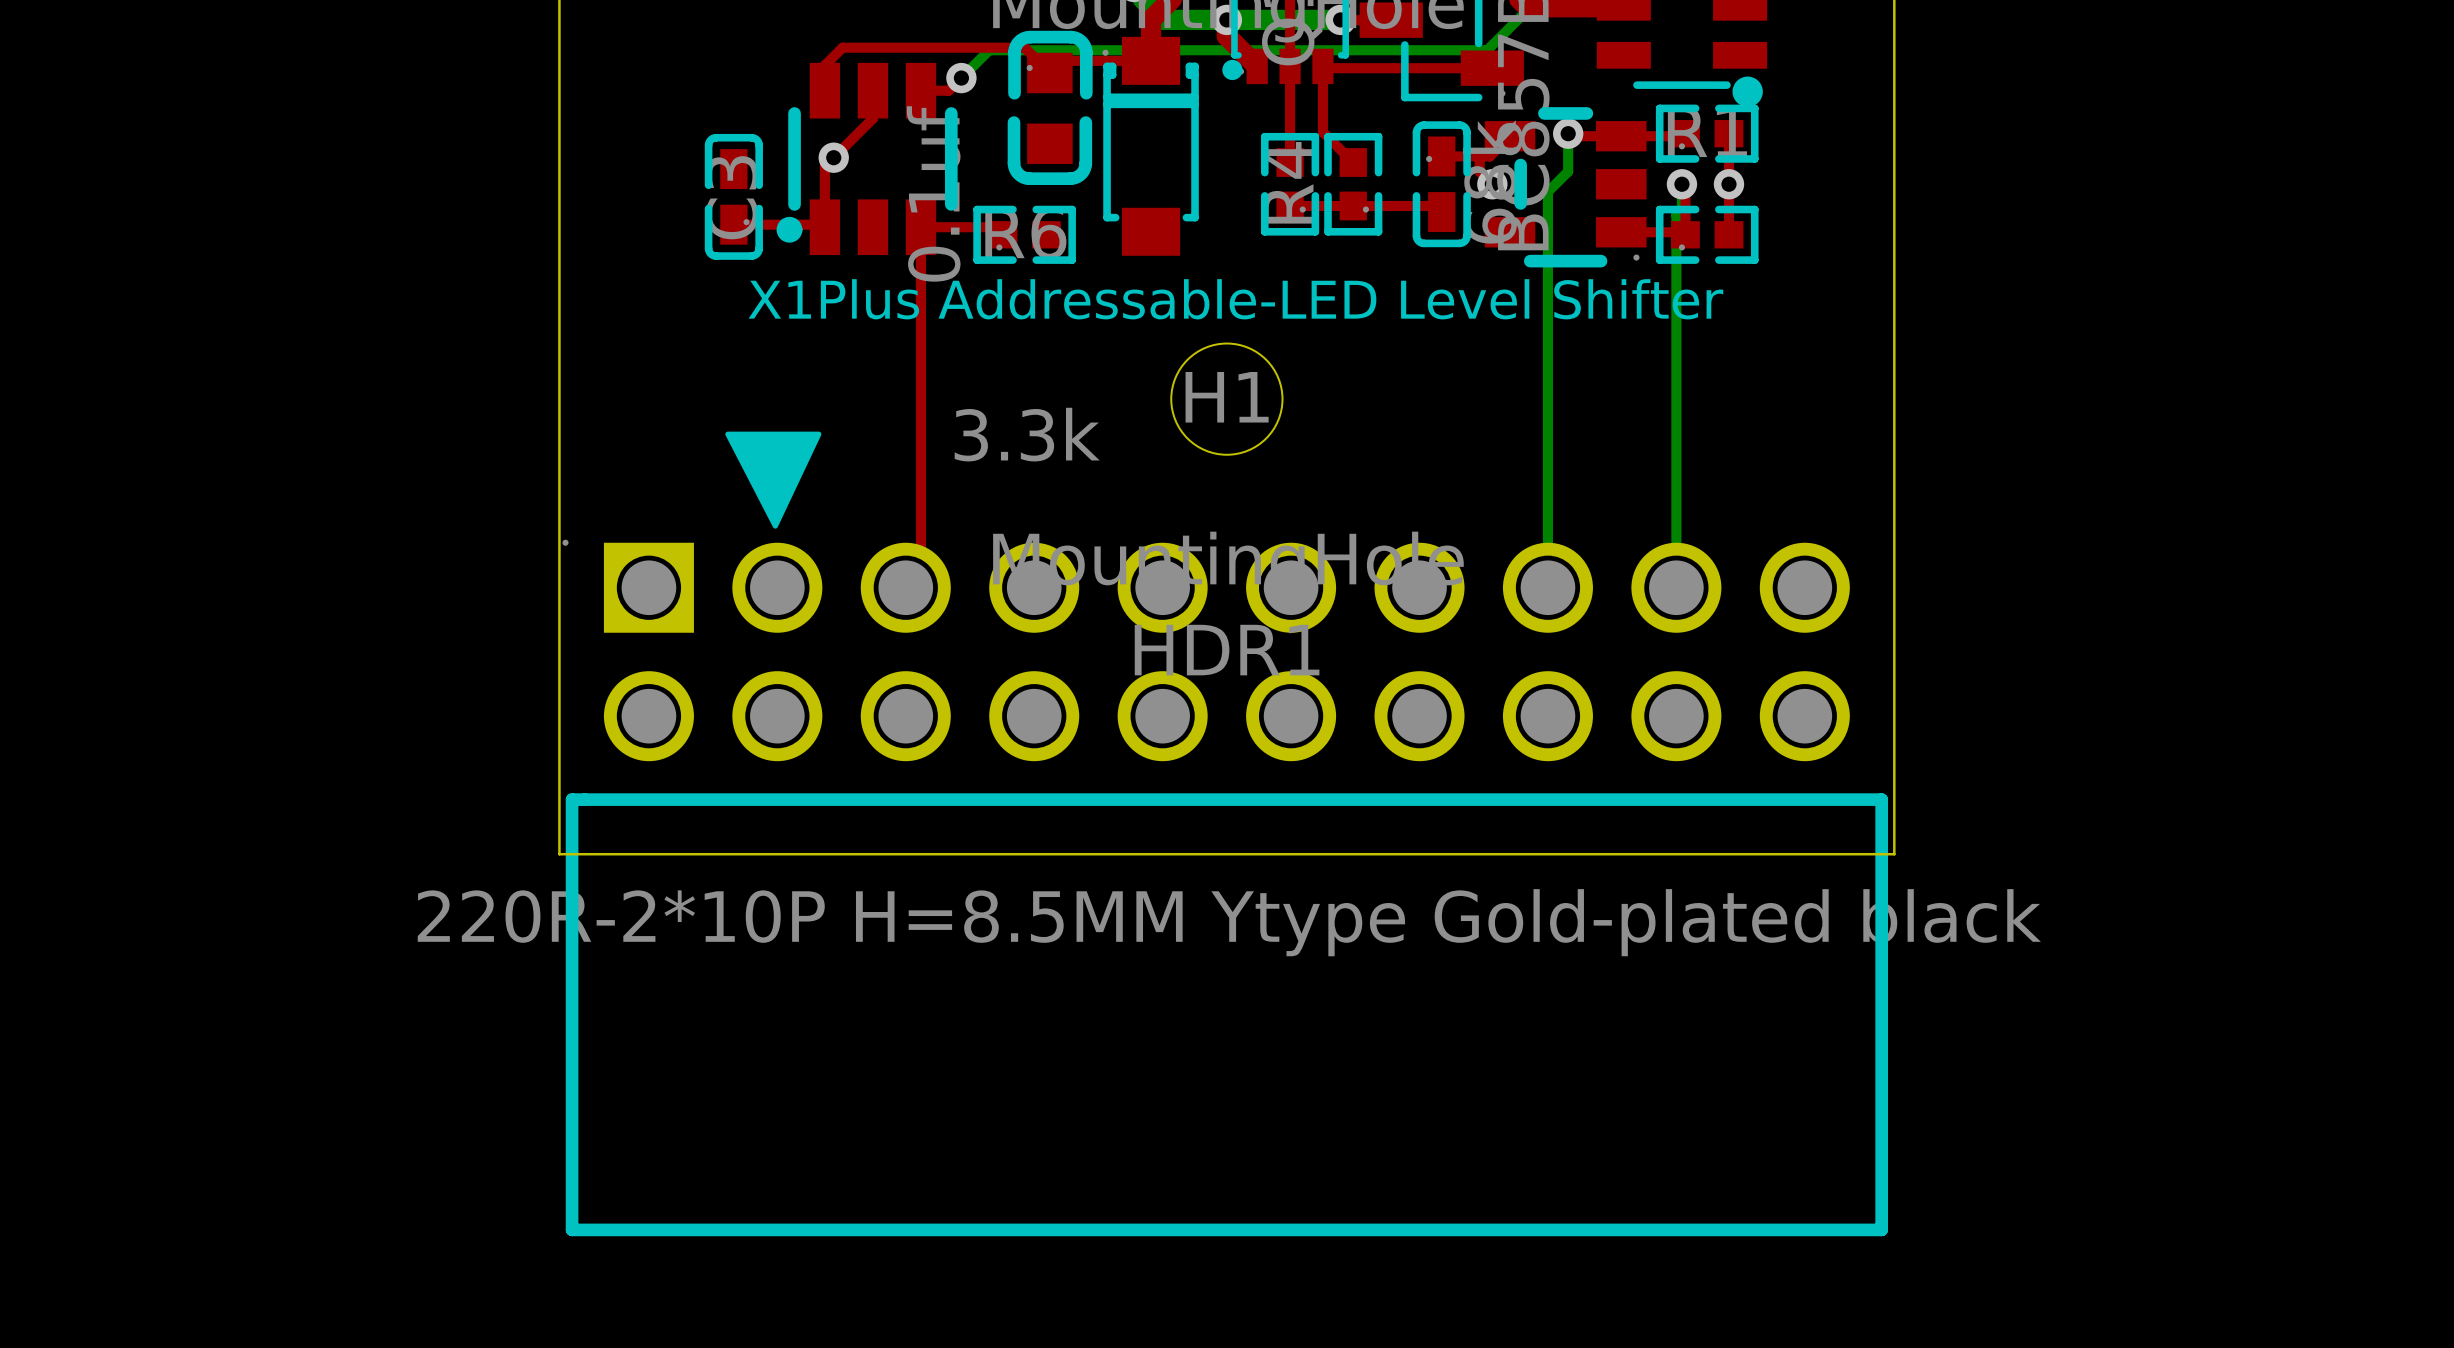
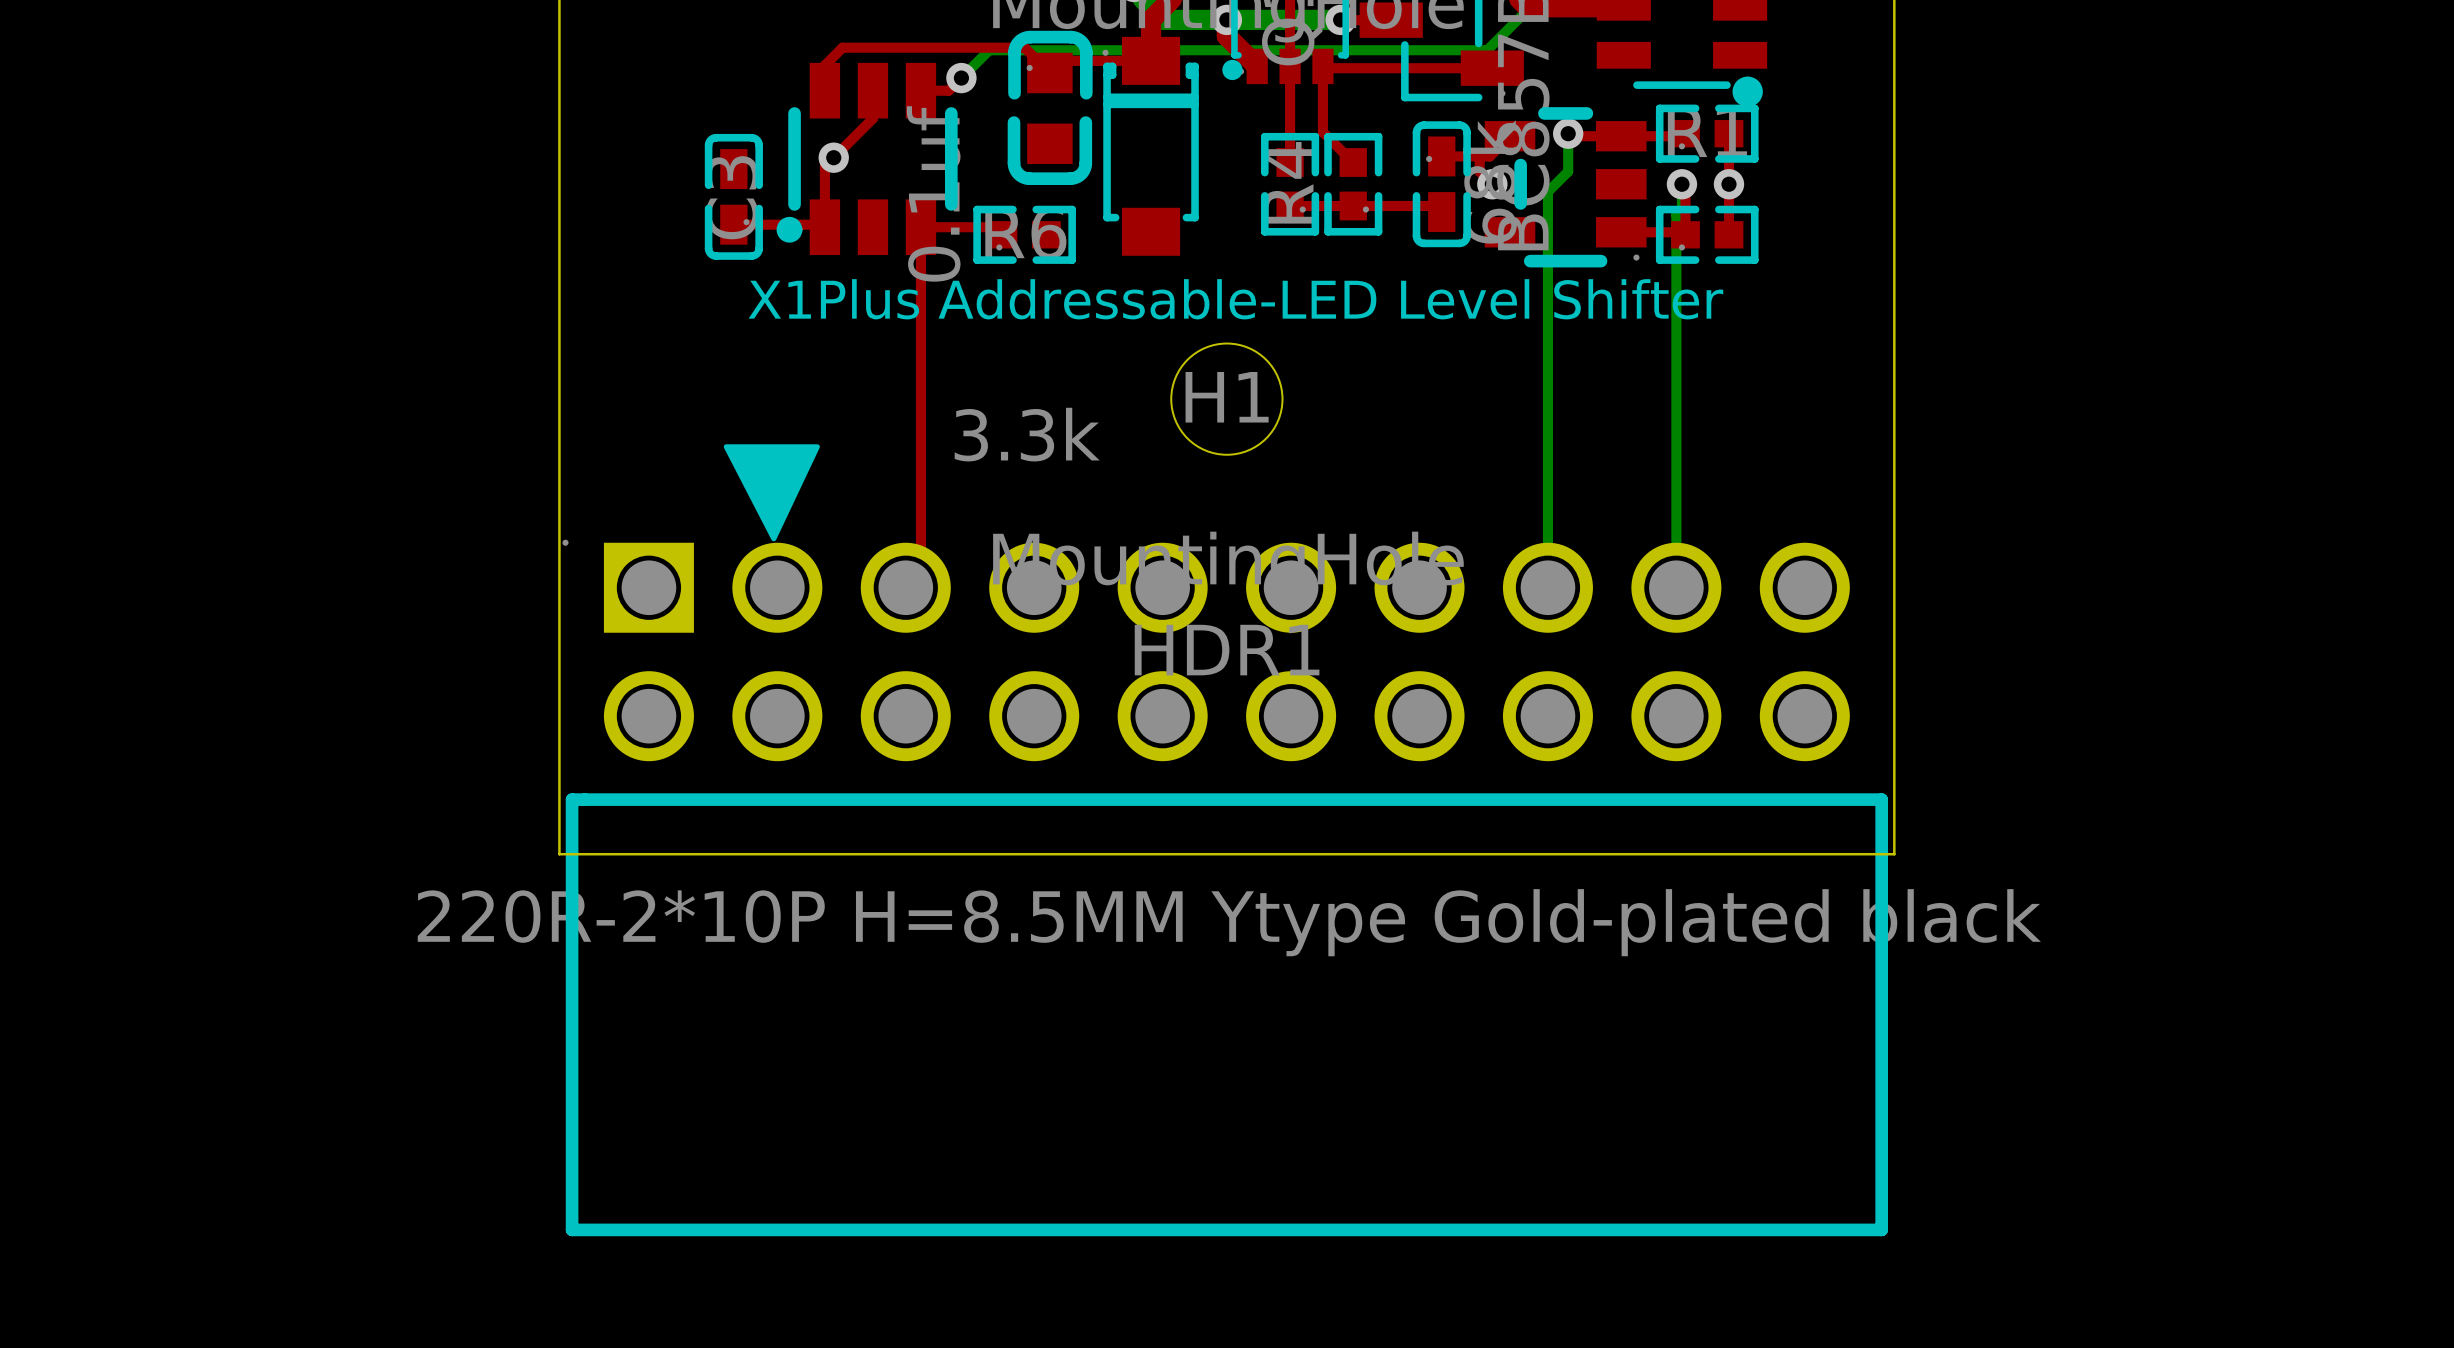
drawing position: (773, 480) -> (771, 492)

